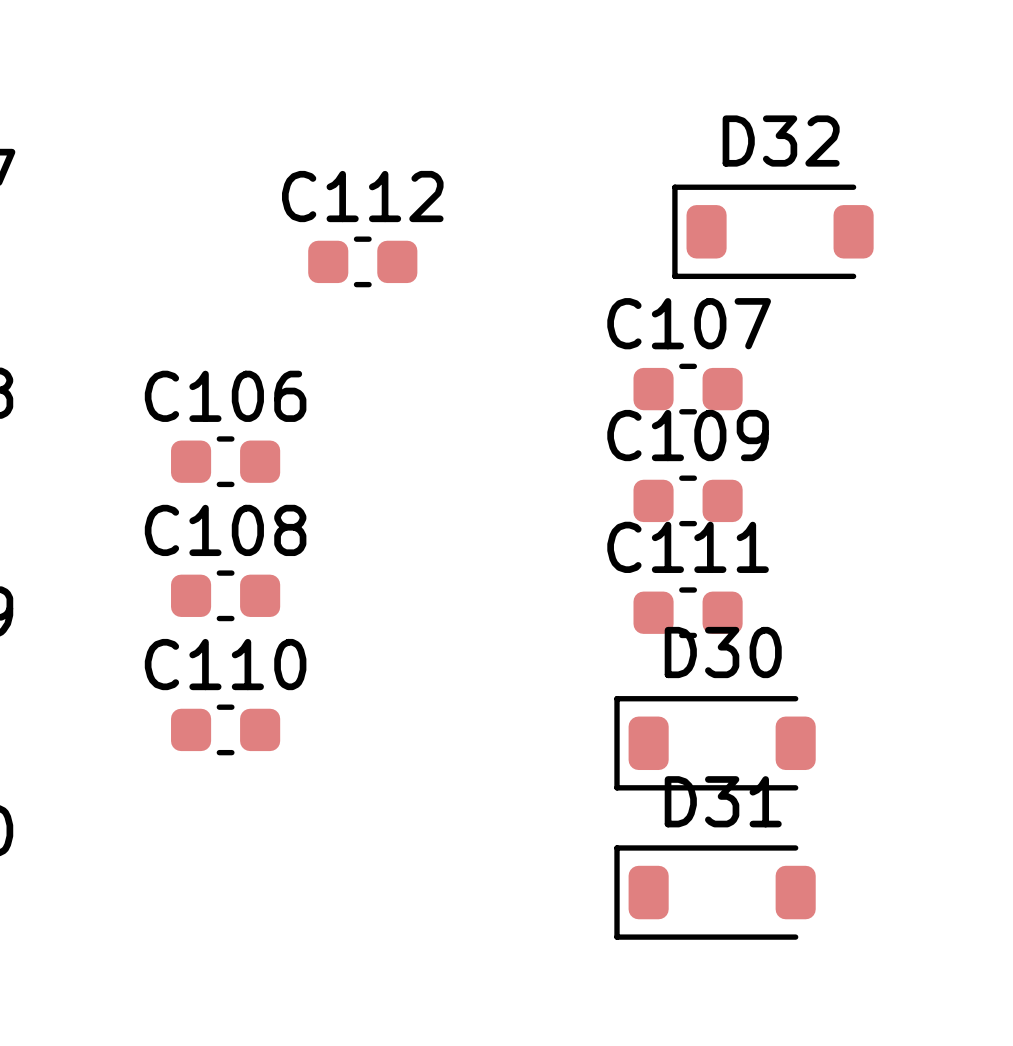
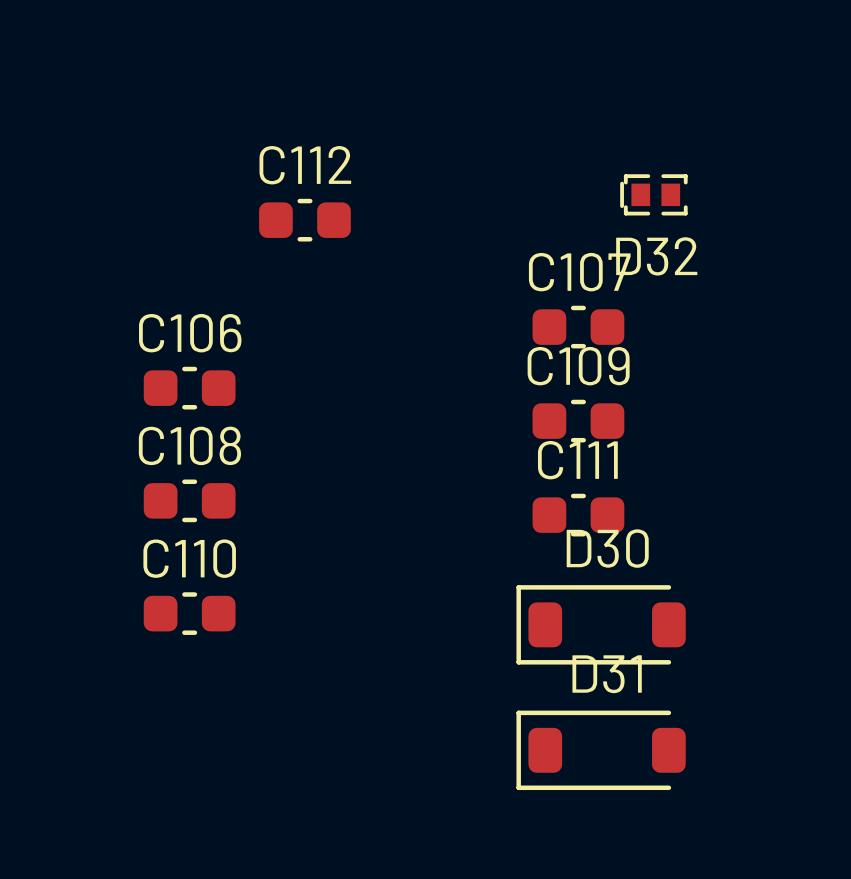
D32 name position: D32 (781, 141) -> D32 (656, 256)
D32 footprint: [672, 184, 874, 280] -> [620, 174, 688, 216]

